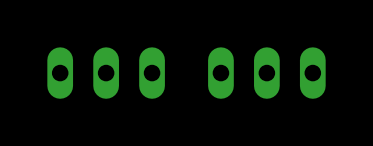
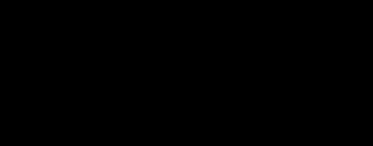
part: (106, 73) -> none
part: (266, 73) -> none

